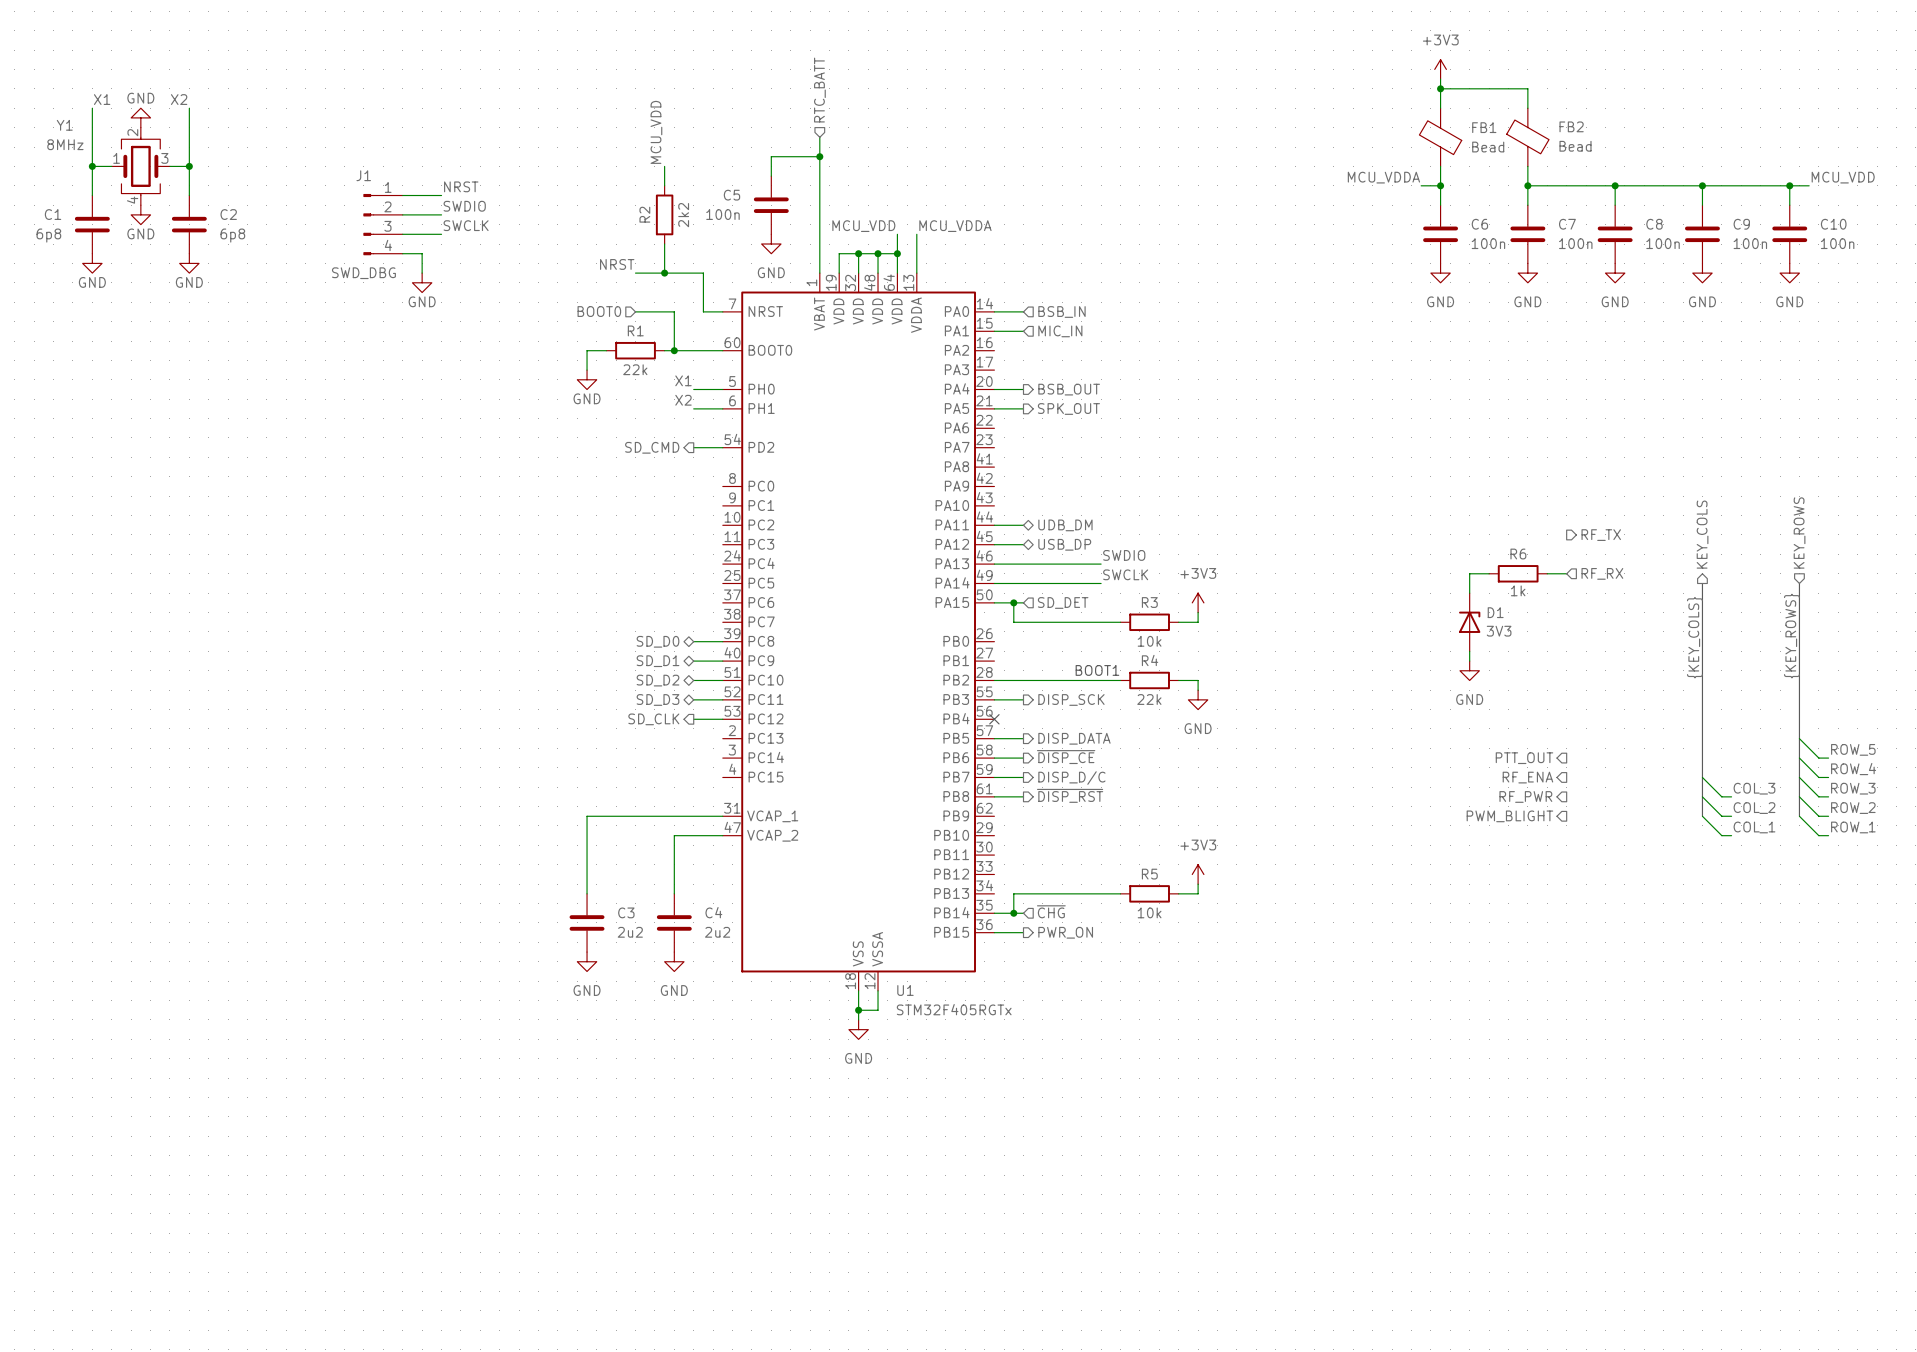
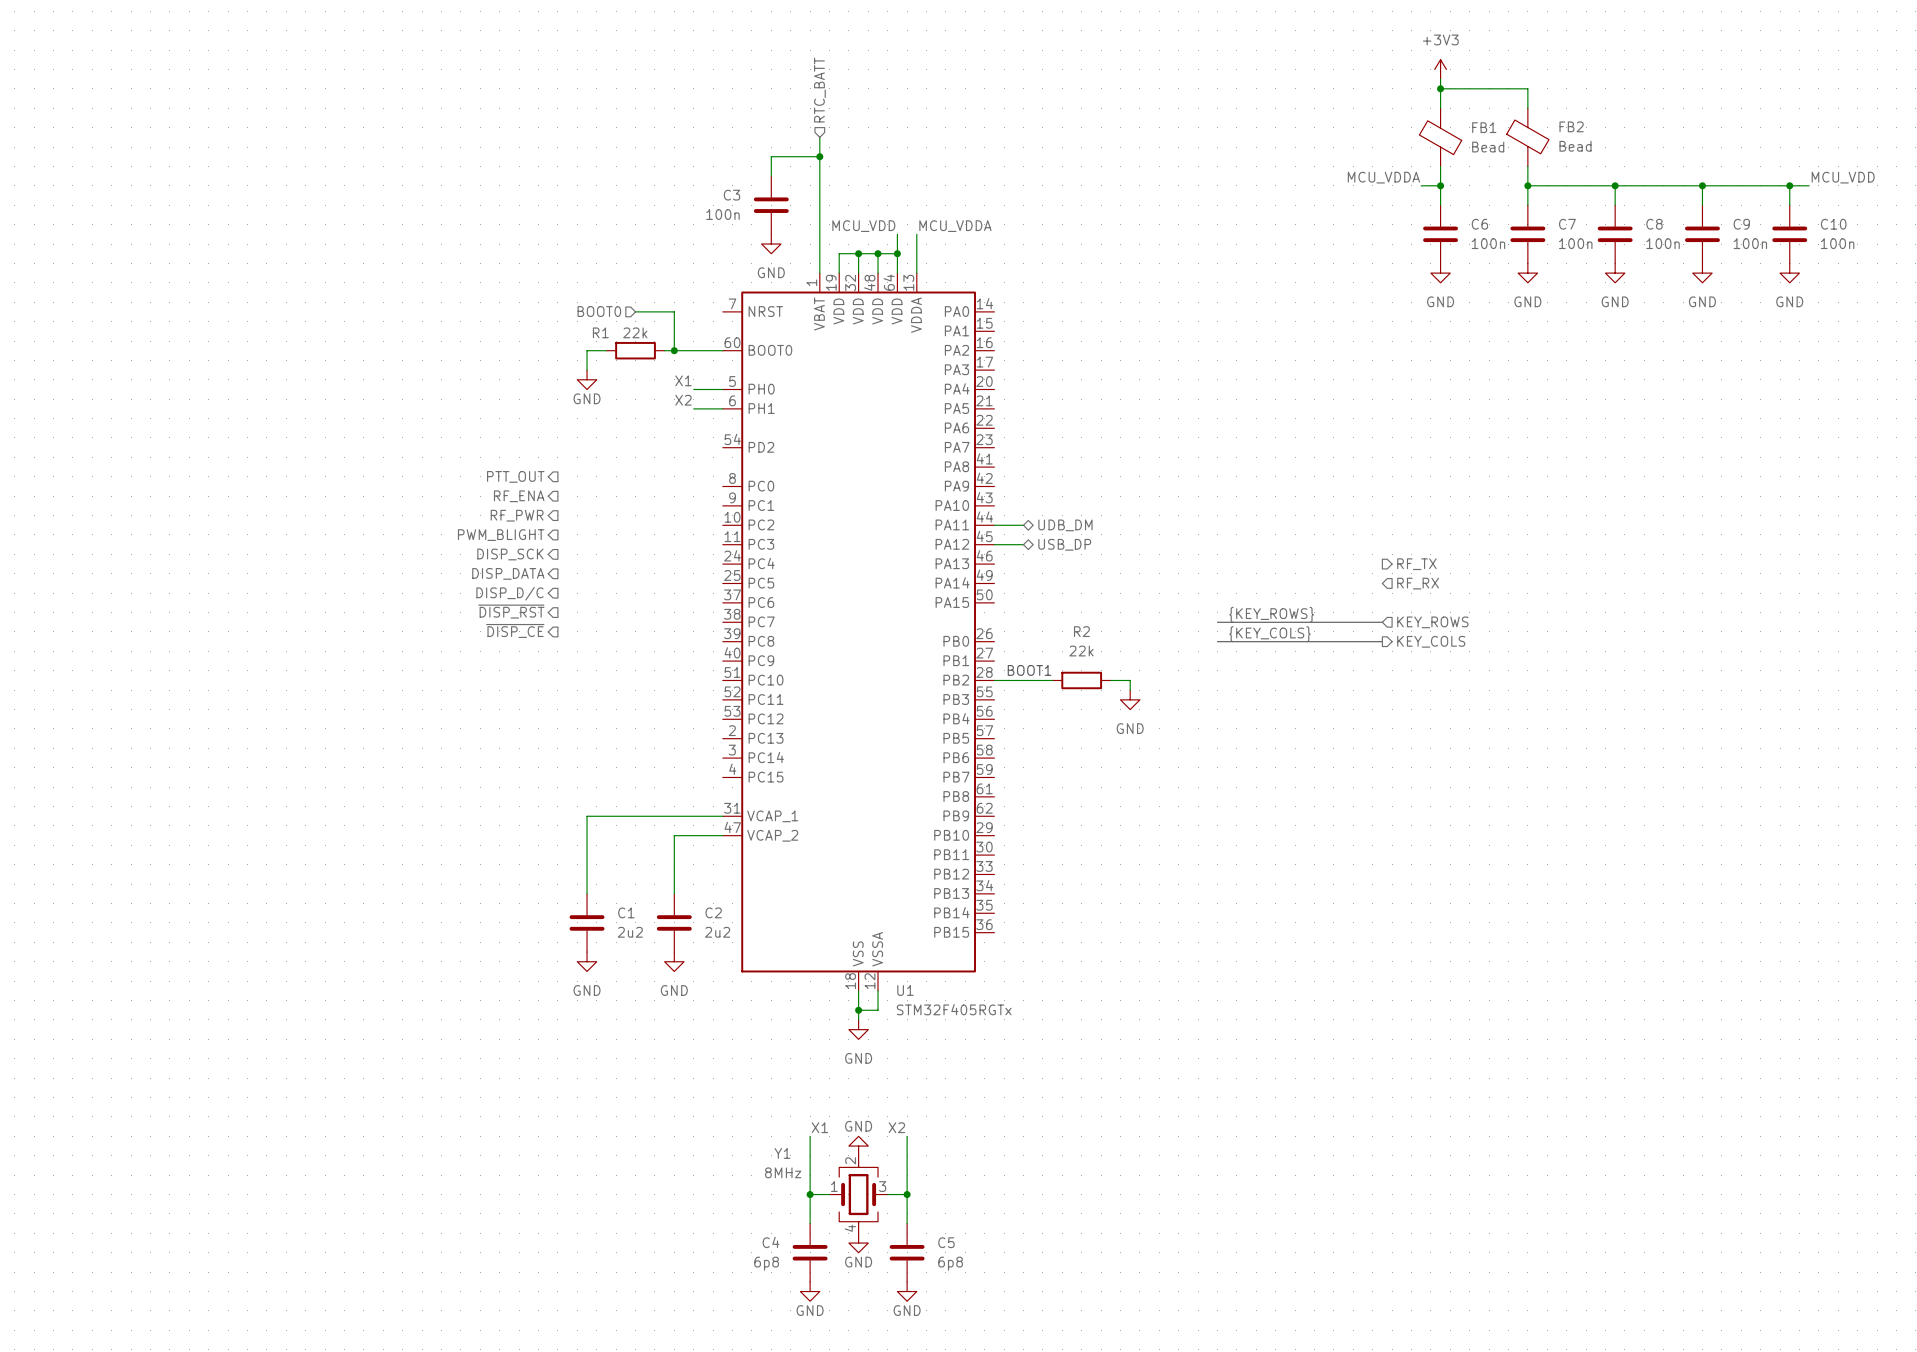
label: X1 (102, 99) -> none
label: X2 (179, 99) -> none
wire: (92, 108) (92, 195) -> none
wire: (189, 108) (189, 195) -> none
power symbol: GND (140, 117) -> none
label: MCU_VDD (656, 132) -> none
wire: (92, 166) (111, 166) -> none
junction: (92, 166) -> none
Y1 position: (140, 166) -> (858, 1194)
wire: (169, 166) (189, 166) -> none
junction: (189, 166) -> none
wire: (664, 166) (664, 185) -> none
label: NRST (461, 186) -> none
wire: (402, 195) (441, 195) -> none
C5 name: C5 (731, 195) -> C3 (731, 195)
label: SWDIO (464, 206) -> none
power symbol: GND (140, 214) -> none
wire: (402, 214) (441, 214) -> none
R2 name position: R2 (644, 214) -> R2 (1081, 631)
R2 rotation: 0° (664, 214) -> 90° clockwise (1081, 680)
R2 position: (664, 214) -> (1081, 680)
R2 value: 2k2 (683, 215) -> 22k (1081, 651)
C1: 6p8 (92, 224) -> none
C2: 6p8 (189, 224) -> none
J1: SWD_DBG (383, 224) -> none
label: SWCLK (466, 225) -> none
wire: (402, 234) (441, 234) -> none
wire: (664, 244) (664, 273) -> none
wire: (402, 253) (422, 253) (422, 273) -> none
power symbol: GND (92, 263) -> none
power symbol: GND (189, 263) -> none
label: NRST (617, 264) -> none
wire: (635, 273) (703, 273) (703, 311) (722, 311) -> none
junction: (664, 273) -> none
power symbol: GND (422, 282) -> none
wire: (994, 311) (1023, 311) -> none
hierarchical label: BSB_IN (1061, 312) -> none
R1 name position: R1 (635, 330) -> R1 (600, 332)
wire: (994, 331) (1023, 331) -> none
hierarchical label: MIC_IN (1060, 331) -> none
R1 value position: 22k (635, 369) -> 22k (635, 332)
wire: (994, 389) (1023, 389) -> none
hierarchical label: BSB_OUT (1069, 389) -> none
wire: (994, 408) (1023, 408) -> none
hierarchical label: SPK_OUT (1068, 408) -> none
hierarchical label: SD_CMD (652, 447) -> none
wire: (693, 447) (722, 447) -> none
hierarchical label: none -> PTT_OUT (515, 476)
hierarchical label: none -> RF_ENA (519, 496)
hierarchical label: none -> RF_PWR (517, 515)
hierarchical label: KEY_ROWS (1799, 532) -> none
hierarchical label: KEY_COLS (1702, 534) -> none
hierarchical label: none -> PWM_BLIGHT (501, 535)
hierarchical label position: RF_TX (1601, 535) -> RF_TX (1416, 564)
hierarchical label: none -> DISP_SCK (510, 554)
label: SWDIO (1124, 555) -> none
wire: (994, 564) (1101, 564) -> none
hierarchical label: none -> DISP_DATA (508, 573)
wire: (1489, 573) (1469, 573) (1469, 593) -> none
R6: 1k (1518, 573) -> none
wire: (1547, 573) (1566, 573) -> none
hierarchical label position: RF_RX (1602, 573) -> RF_RX (1418, 583)
label: SWCLK (1125, 574) -> none
wire: (994, 583) (1101, 583) -> none
bus: (1702, 583) (1702, 816) -> none
bus: (1799, 583) (1799, 816) -> none
hierarchical label: none -> DISP_D/C (509, 593)
wire: (994, 602) (1023, 602) -> none
wire: (1013, 602) (1013, 622) (1120, 622) -> none
junction: (1013, 602) -> none
hierarchical label: SD_DET (1063, 602) -> none
power symbol: +3V3 (1198, 602) -> none
hierarchical label: none -> ~{DISP_RST} (511, 611)
wire: (1198, 612) (1198, 622) (1178, 622) -> none
label: none -> {KEY_ROWS} (1271, 614)
R3: 10k (1149, 622) -> none
bus: none -> (1217, 622) (1382, 622)
hierarchical label: none -> KEY_ROWS (1432, 622)
D1: 3V3 (1469, 622) -> none
hierarchical label: none -> ~{DISP_CE} (515, 630)
label: none -> {KEY_COLS} (1269, 634)
label: {KEY_ROWS} (1791, 636) -> none
label: {KEY_COLS} (1694, 637) -> none
hierarchical label: SD_D0 (658, 641) -> none
wire: (693, 641) (722, 641) -> none
bus: none -> (1217, 641) (1382, 641)
hierarchical label: none -> KEY_COLS (1431, 641)
wire: (1469, 651) (1469, 661) -> none
hierarchical label: SD_D1 (658, 661) -> none
wire: (693, 661) (722, 661) -> none
text position: BOOT1 (1097, 670) -> BOOT1 (1029, 670)
power symbol: GND (1469, 670) -> none
hierarchical label: SD_D2 (658, 680) -> none
wire: (693, 680) (722, 680) -> none
wire: (1052, 680) (1110, 680) -> none
R4: 22k (1149, 680) -> none
wire: (1178, 680) (1198, 680) (1198, 690) -> none
hierarchical label: SD_D3 (658, 699) -> none
wire: (693, 699) (722, 699) -> none
wire: (994, 699) (1023, 699) -> none
hierarchical label: DISP_SCK (1071, 699) -> none
power symbol position: GND (1198, 699) -> GND (1130, 699)
hierarchical label: SD_CLK (653, 719) -> none
wire: (693, 719) (722, 719) -> none
no-connect mark: (994, 719) -> none
wire: (994, 738) (1023, 738) -> none
hierarchical label: DISP_DATA (1074, 738) -> none
wire: (1799, 738) (1818, 758) (1828, 758) -> none
label: ROW_5 (1853, 749) -> none
hierarchical label: ~{DISP_CE} (1066, 757) -> none
wire: (994, 758) (1023, 758) -> none
hierarchical label: PTT_OUT (1524, 758) -> none
wire: (1799, 758) (1818, 777) (1828, 777) -> none
label: ROW_4 (1853, 769) -> none
wire: (994, 777) (1023, 777) -> none
hierarchical label: RF_ENA (1527, 777) -> none
wire: (1702, 777) (1721, 796) (1731, 796) -> none
wire: (1799, 777) (1818, 796) (1828, 796) -> none
hierarchical label: DISP_D/C (1071, 778) -> none
label: COL_3 (1754, 788) -> none
label: ROW_3 (1853, 788) -> none
hierarchical label: ~{DISP_RST} (1070, 795) -> none
wire: (994, 796) (1023, 796) -> none
hierarchical label: RF_PWR (1525, 796) -> none
wire: (1702, 796) (1721, 816) (1731, 816) -> none
wire: (1799, 796) (1818, 816) (1828, 816) -> none
label: COL_2 (1754, 808) -> none
label: ROW_2 (1853, 808) -> none
hierarchical label: PWM_BLIGHT (1509, 816) -> none
wire: (1702, 816) (1721, 835) (1731, 835) -> none
wire: (1799, 816) (1818, 835) (1828, 835) -> none
label: COL_1 (1754, 827) -> none
label: ROW_1 (1853, 827) -> none
power symbol: +3V3 (1198, 874) -> none
wire: (1198, 884) (1198, 893) (1178, 893) -> none
wire: (1120, 893) (1013, 893) (1013, 913) -> none
R5: 10k (1149, 893) -> none
hierarchical label: ~{CHG} (1051, 911) -> none
C3 name: C3 (626, 912) -> C1 (626, 912)
C4 name: C4 (713, 912) -> C2 (713, 912)
wire: (994, 913) (1023, 913) -> none
junction: (1013, 913) -> none
wire: (994, 932) (1023, 932) -> none
hierarchical label: PWR_ON (1065, 932) -> none
label: none -> X1 (819, 1127)
label: none -> X2 (896, 1127)
wire: none -> (810, 1136) (810, 1223)
wire: none -> (907, 1136) (907, 1223)
power symbol: none -> GND (858, 1146)
wire: none -> (810, 1194) (829, 1194)
junction: none -> (810, 1194)
wire: none -> (887, 1194) (907, 1194)
junction: none -> (907, 1194)
power symbol: none -> GND (858, 1243)
C4: none -> 6p8 (810, 1252)
C5: none -> 6p8 (907, 1252)
power symbol: none -> GND (810, 1291)
power symbol: none -> GND (907, 1291)

